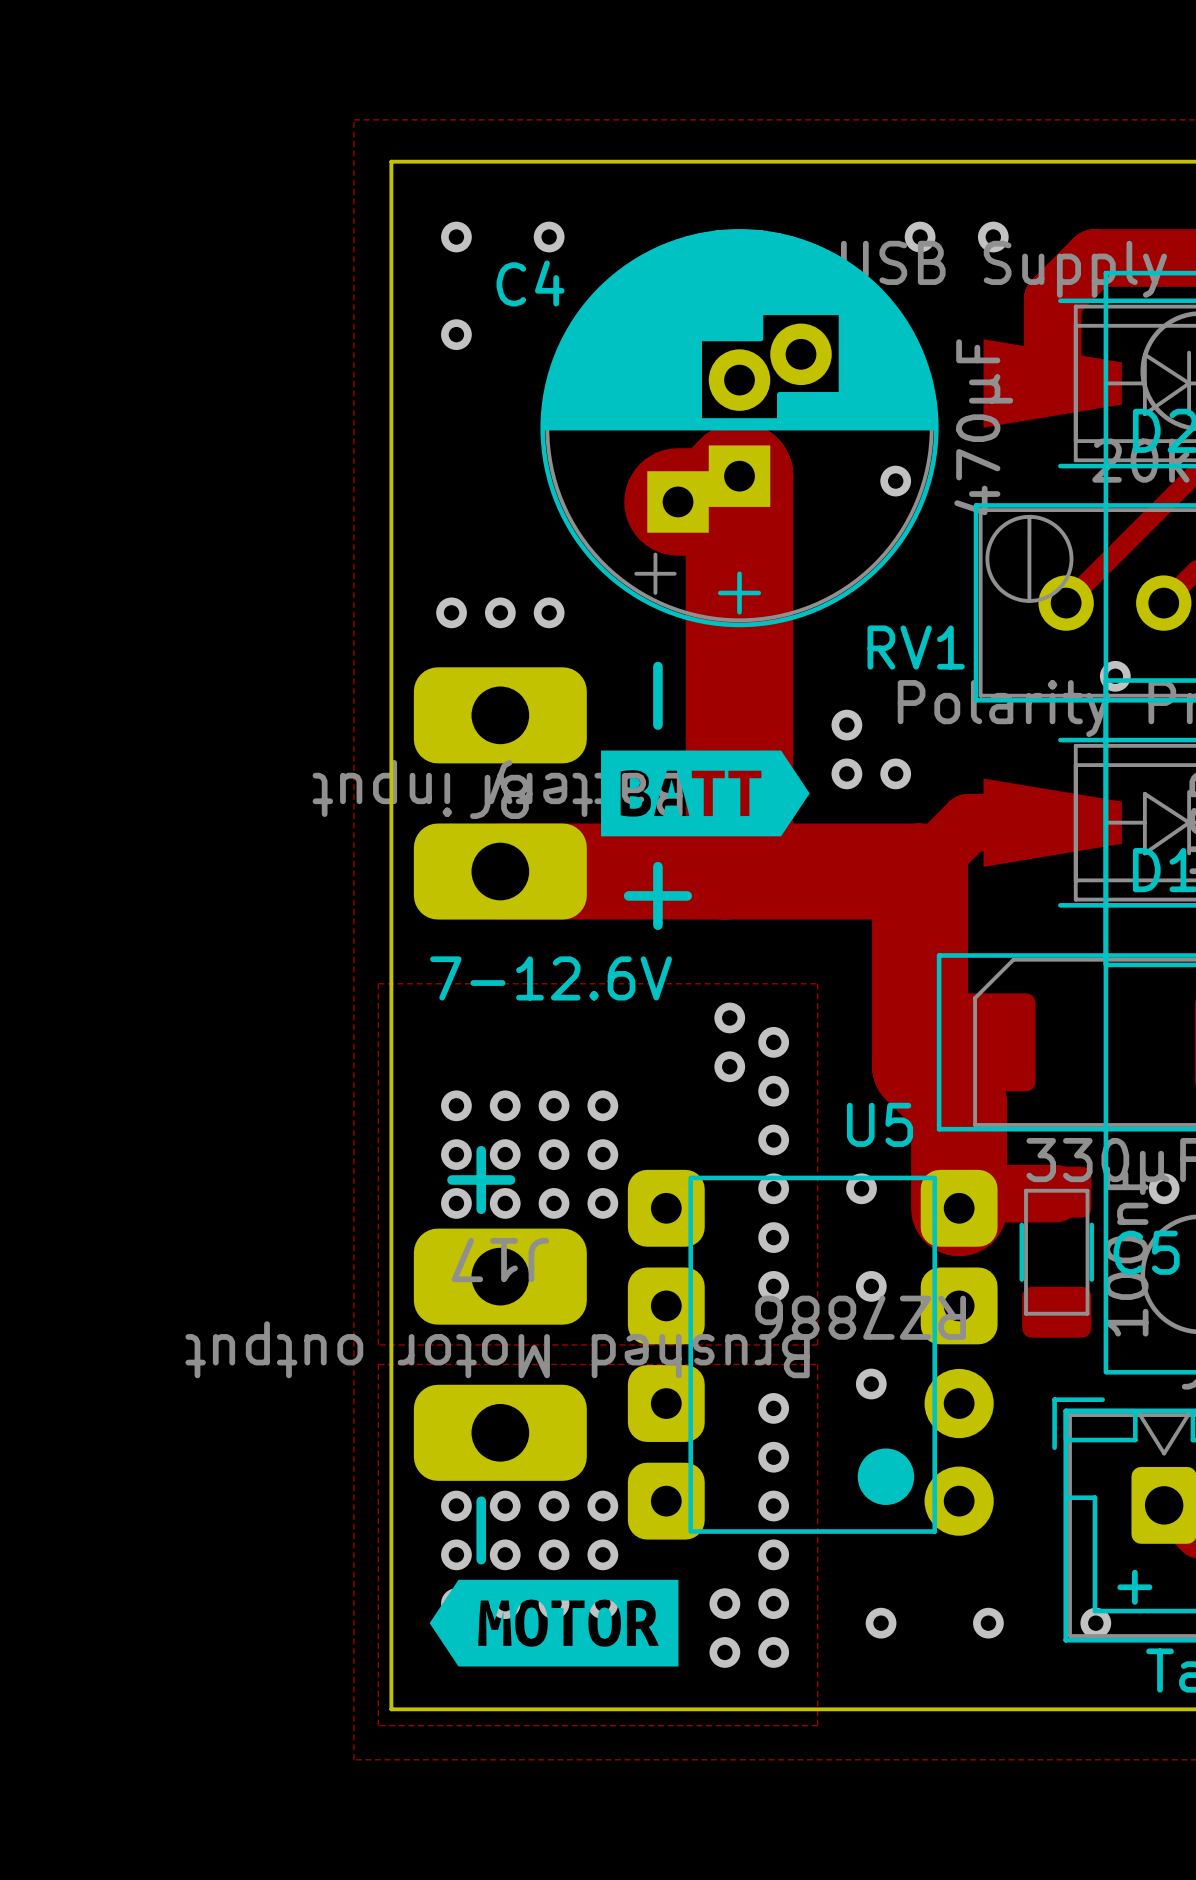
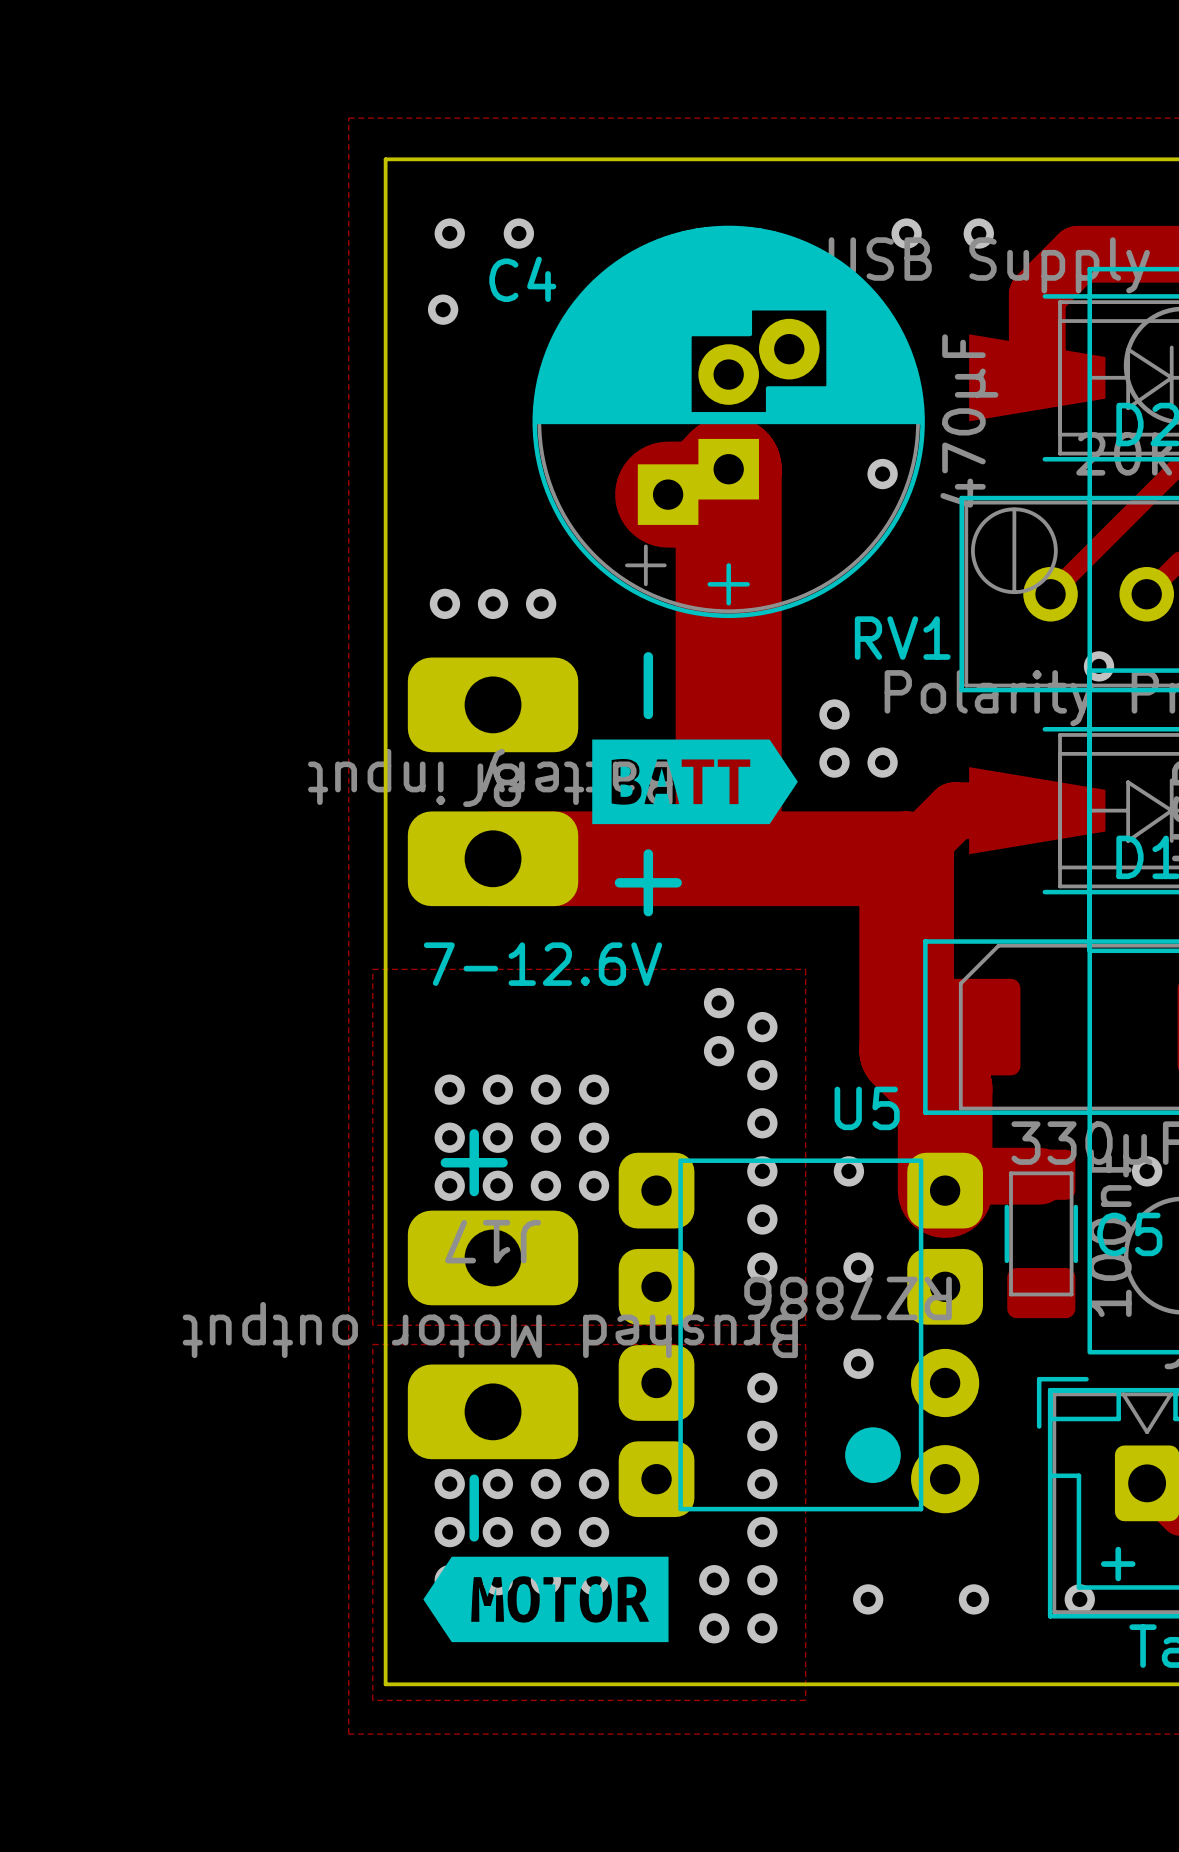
via position: (549, 237) -> (518, 233)
via position: (456, 334) -> (443, 309)

